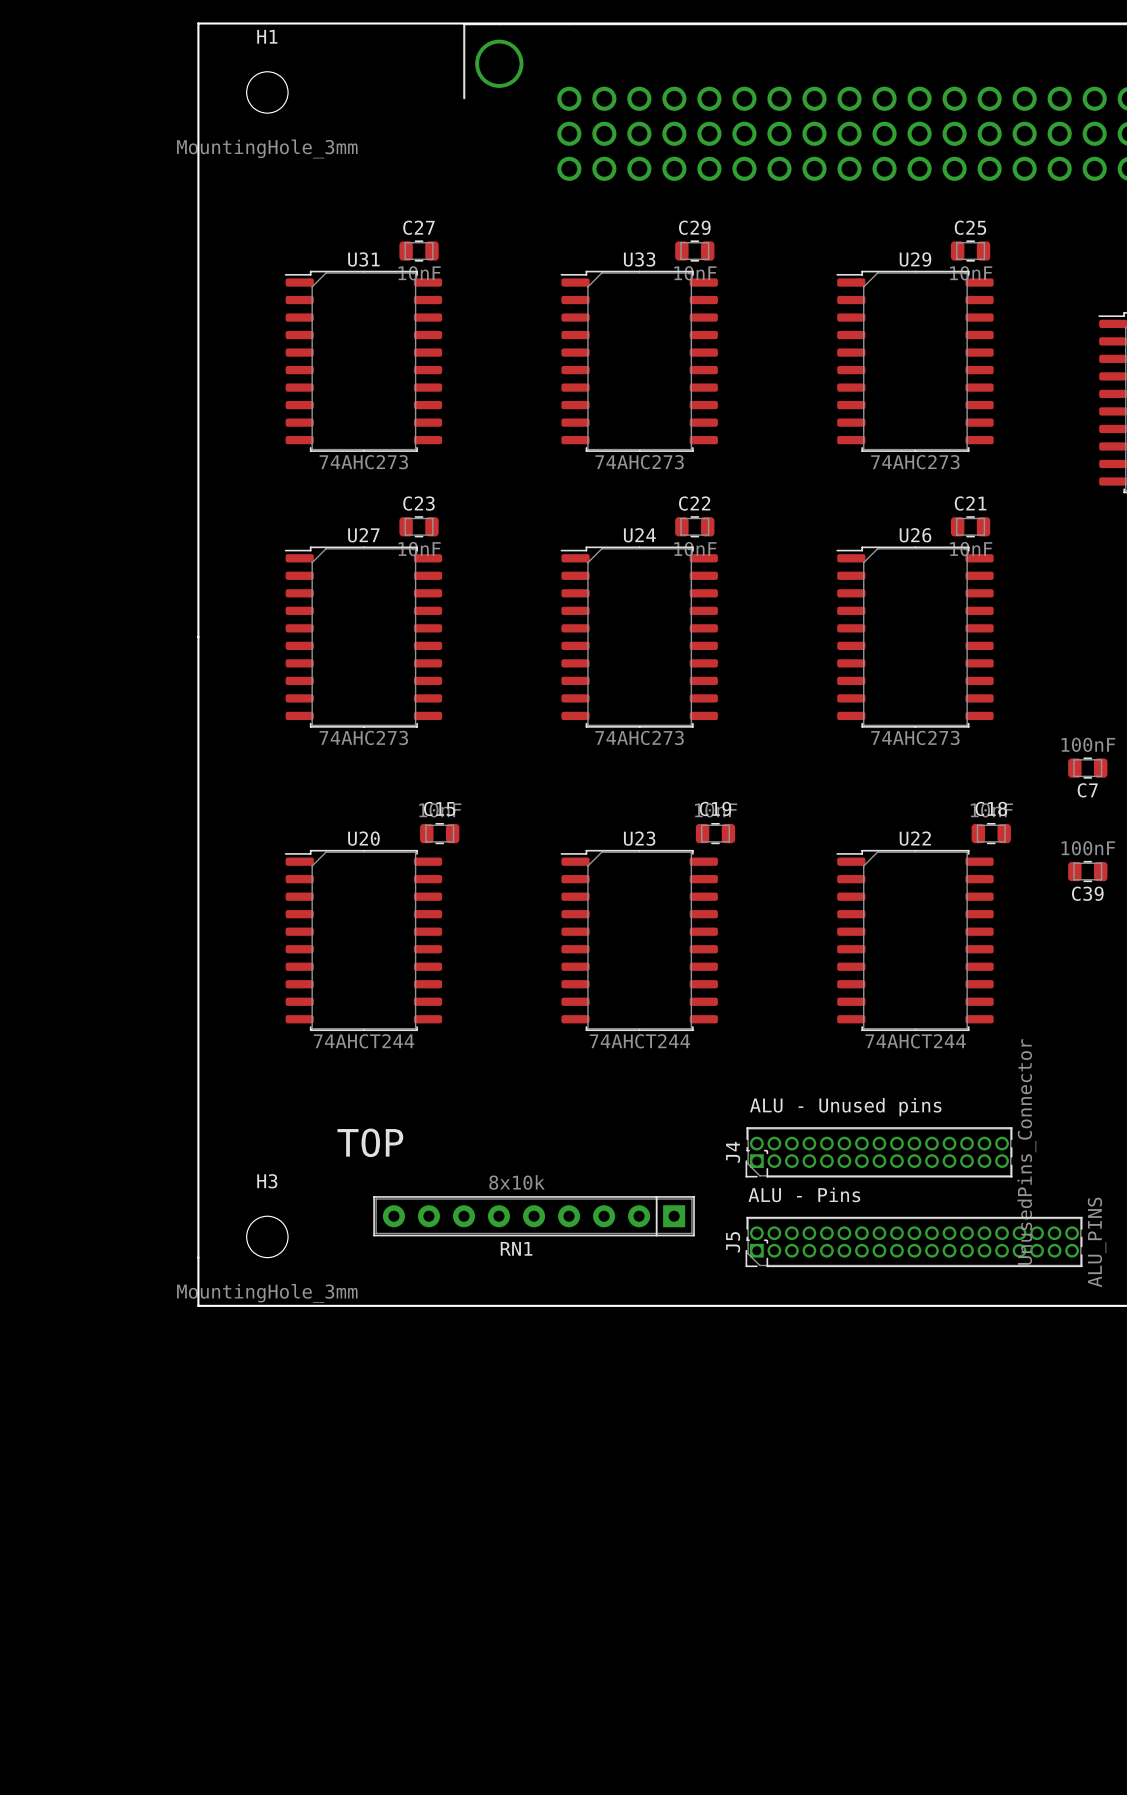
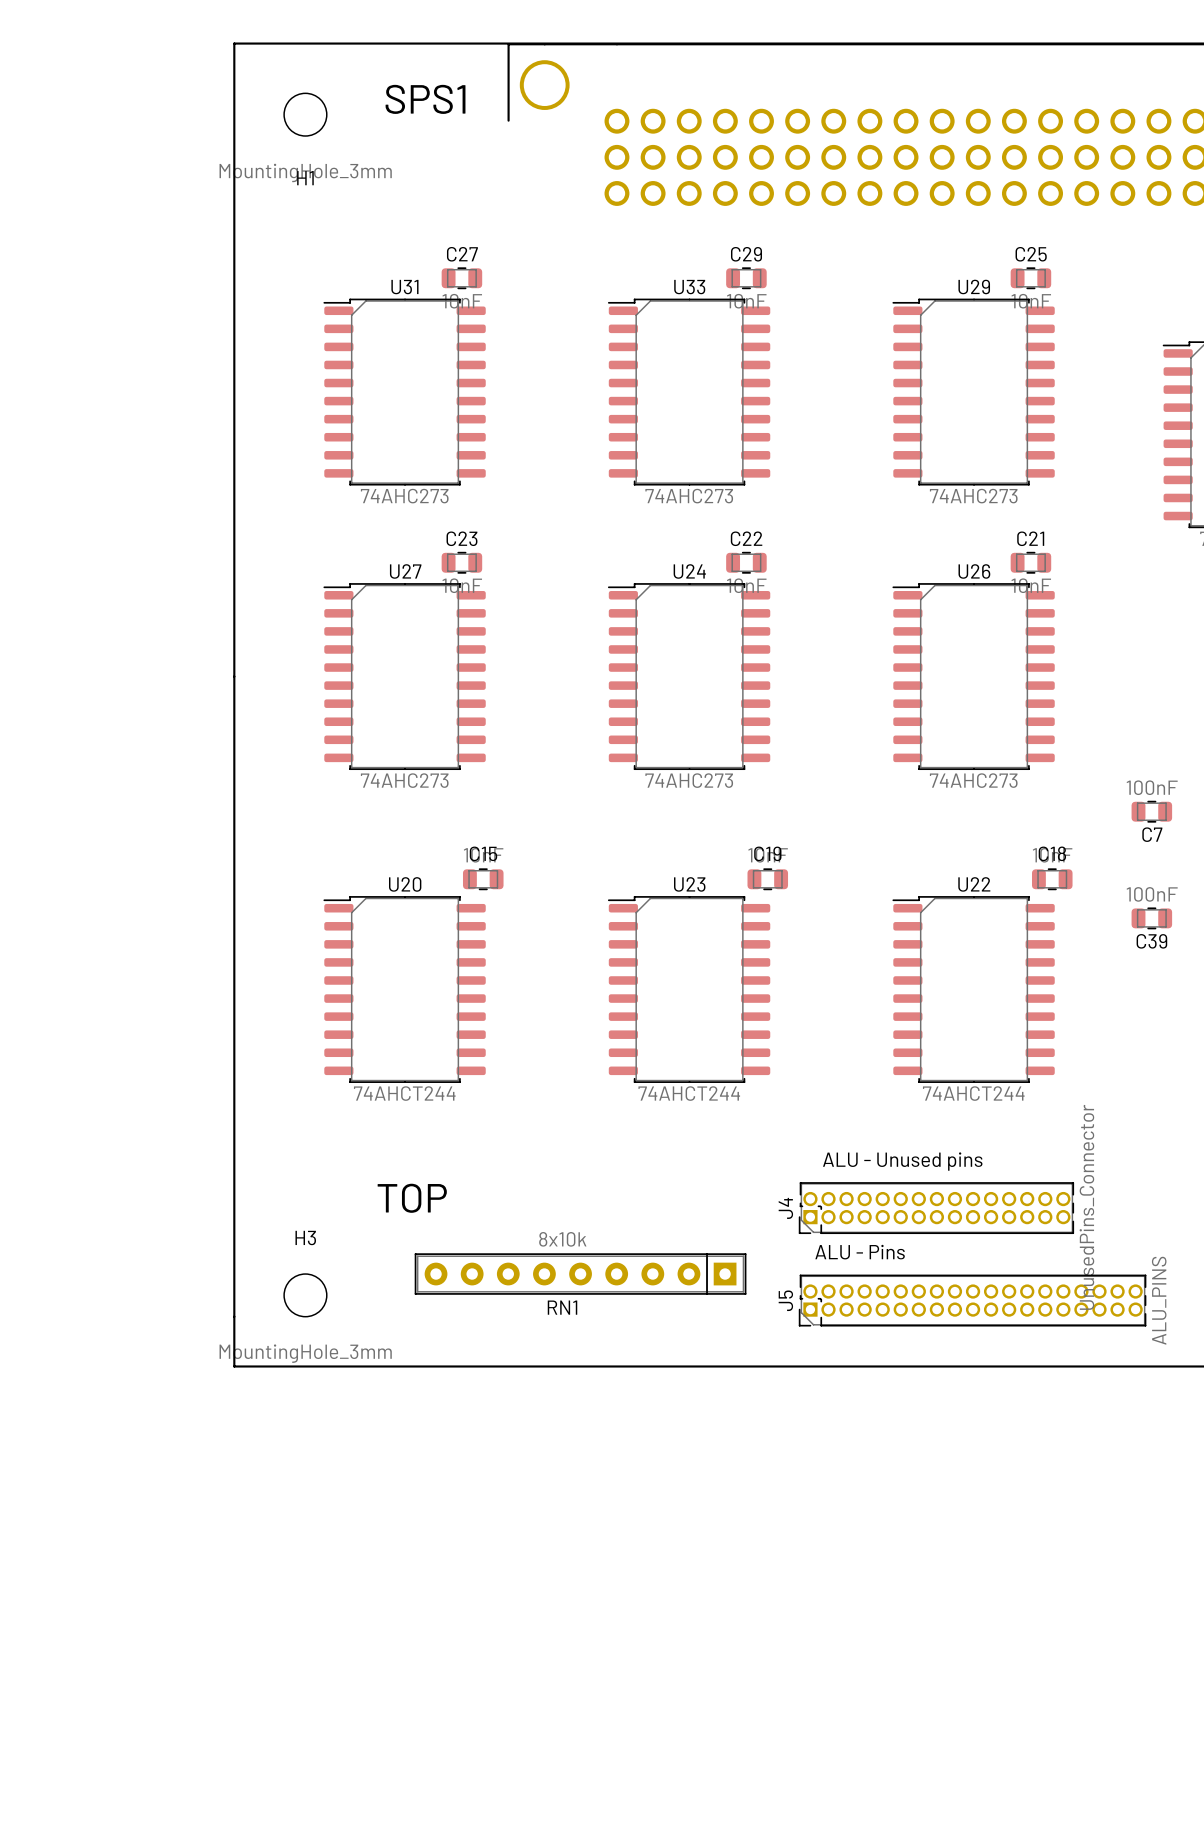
H1 name position: H1 (267, 36) -> H1 (305, 178)
text: none -> SPS1 (425, 99)

